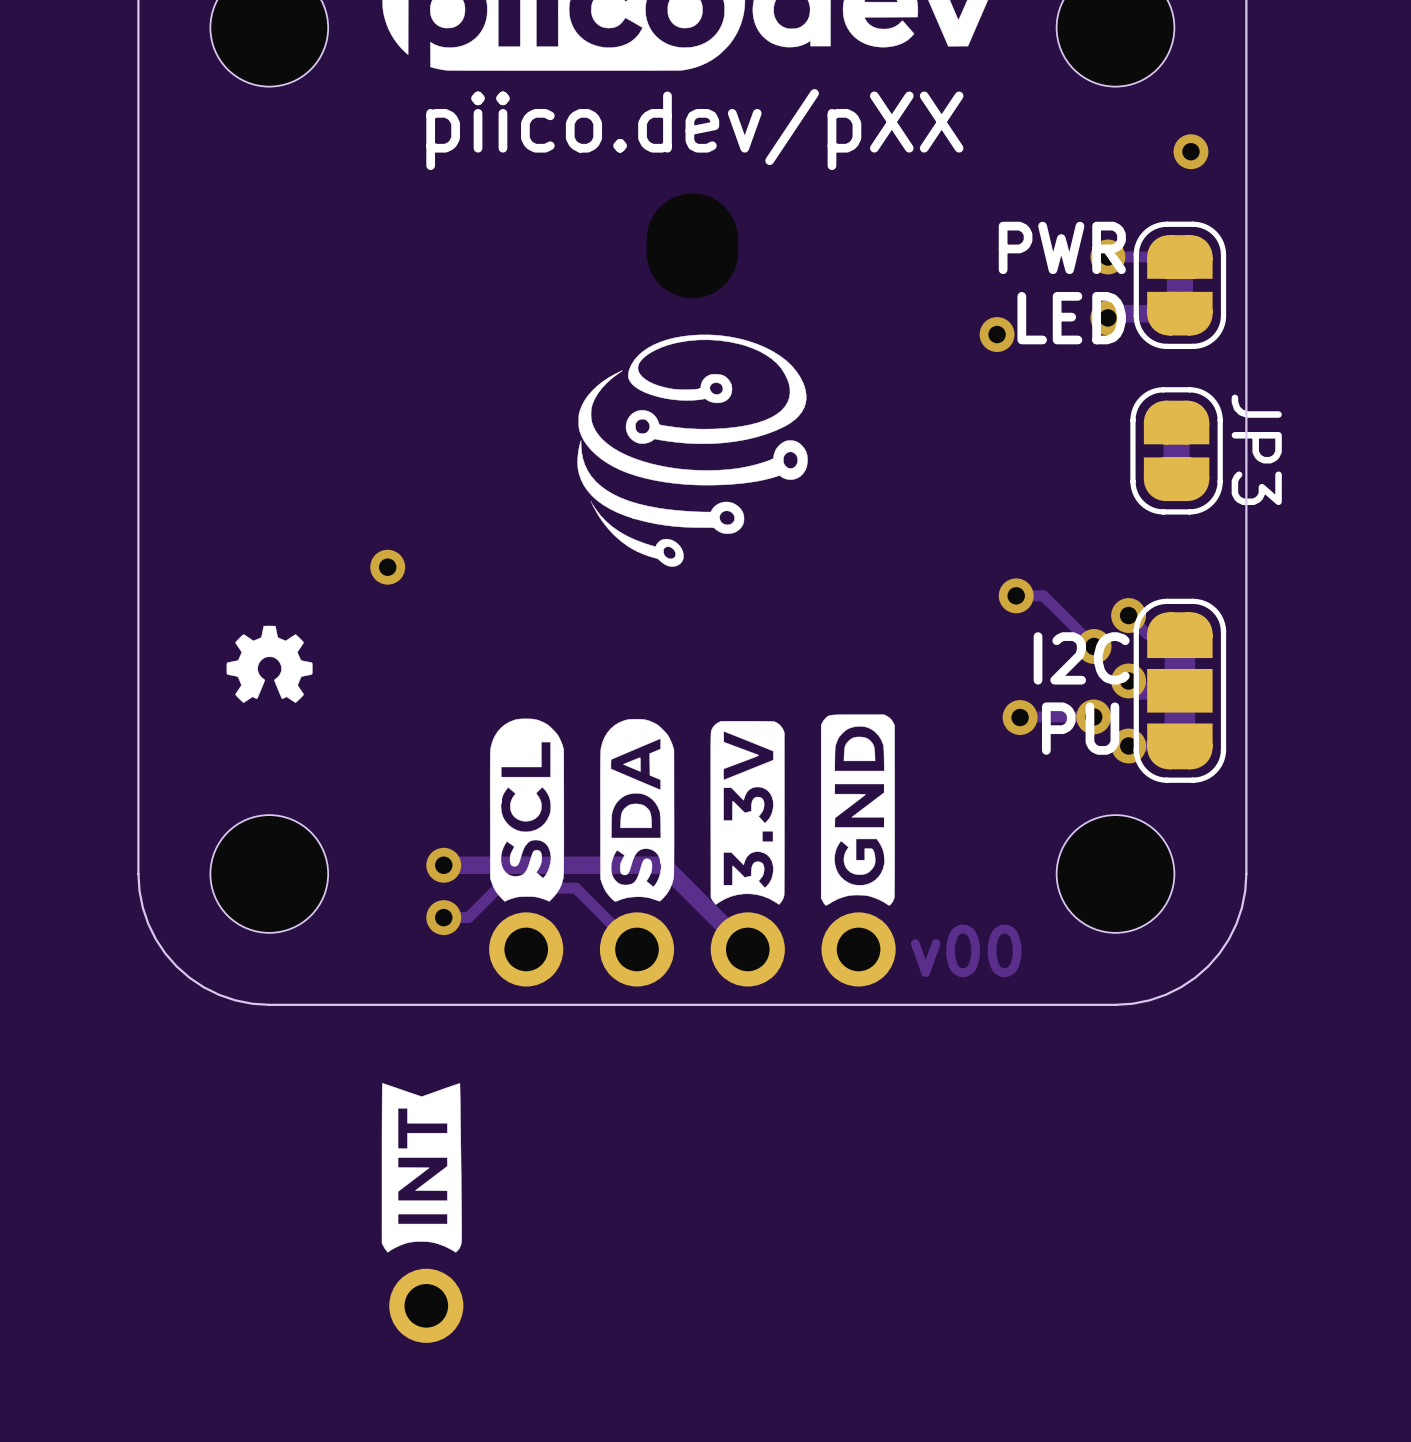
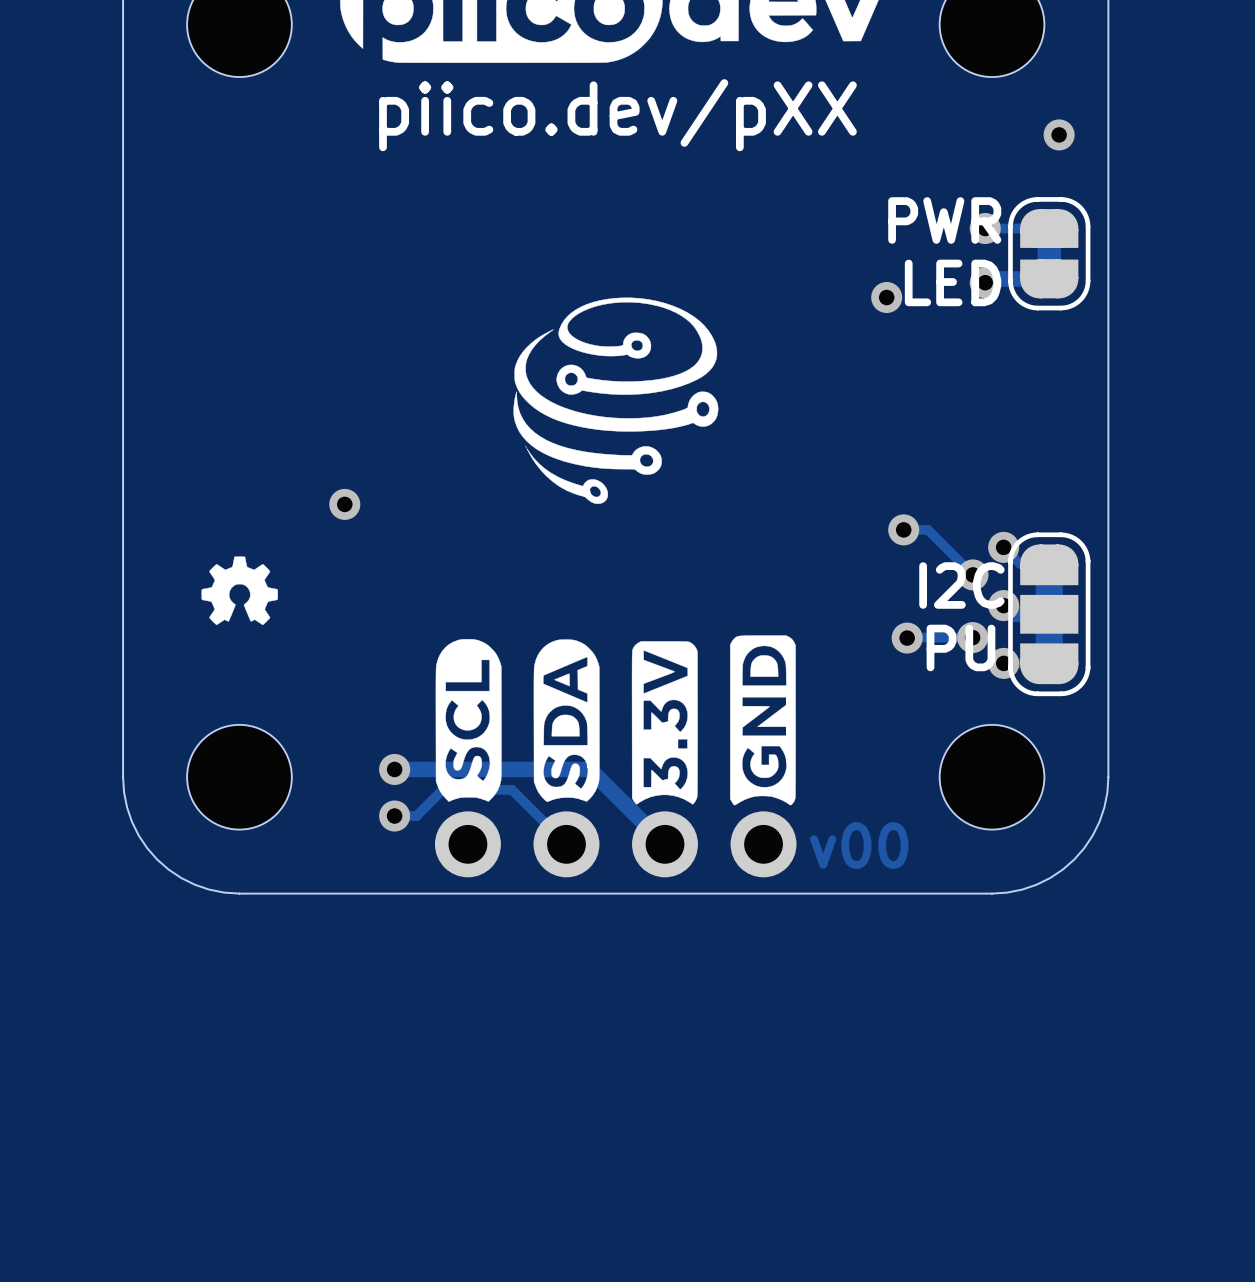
part: (692, 245) -> none
JP3: (1176, 450) -> none
part: (422, 1213) -> none

